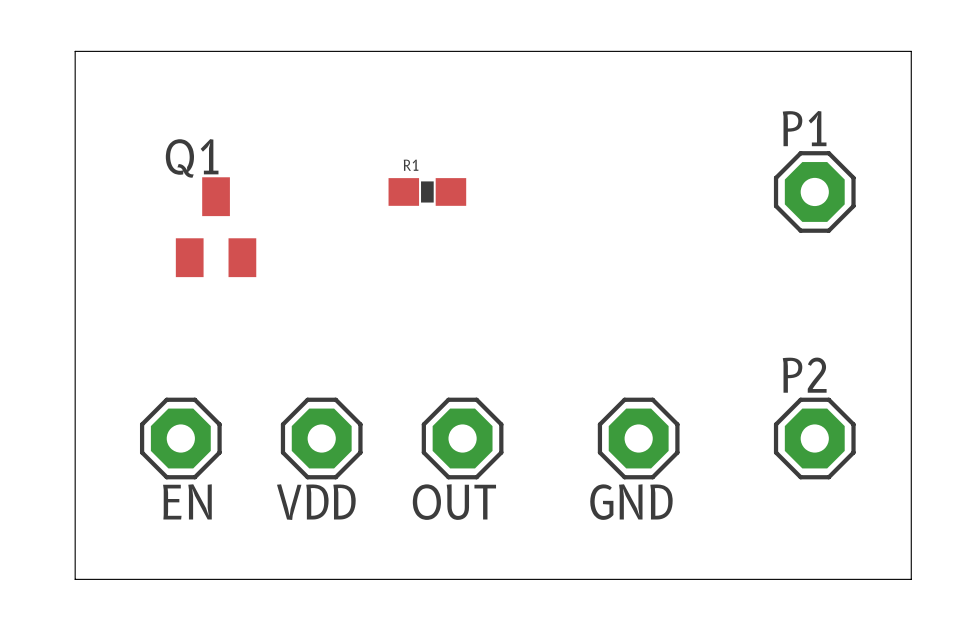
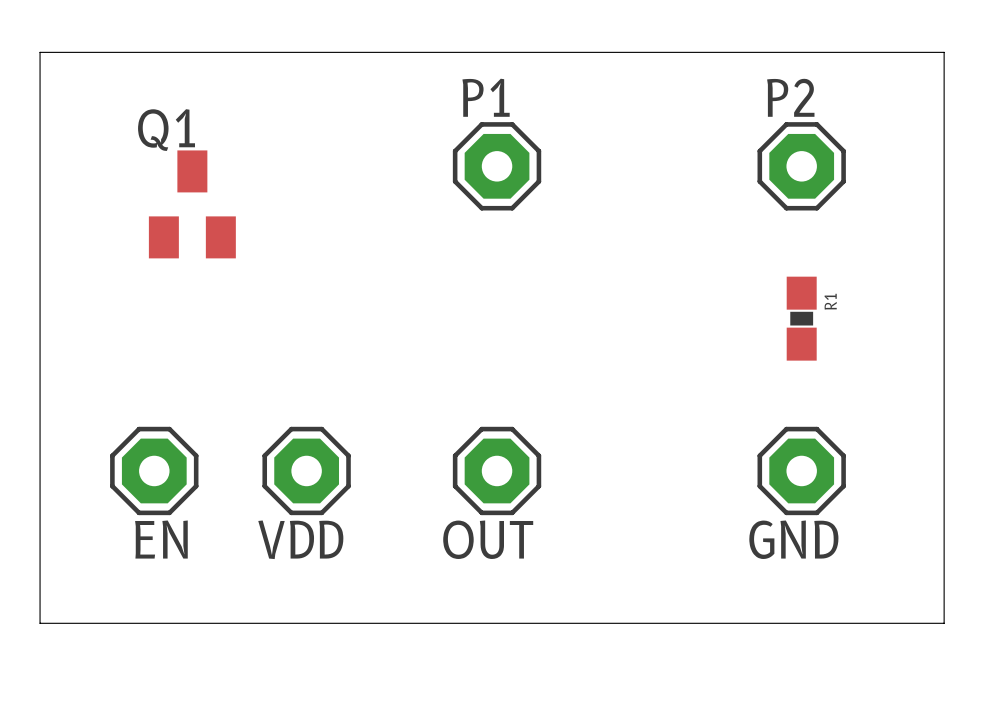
R1 rotation: 0° (427, 191) -> 90° clockwise (801, 318)
R1 position: (427, 191) -> (801, 318)
P1 position: (814, 191) -> (497, 166)
Q1 position: (216, 227) -> (192, 204)
OUT position: (462, 438) -> (497, 470)
GND position: (638, 438) -> (801, 470)
P2 position: (814, 438) -> (801, 166)

